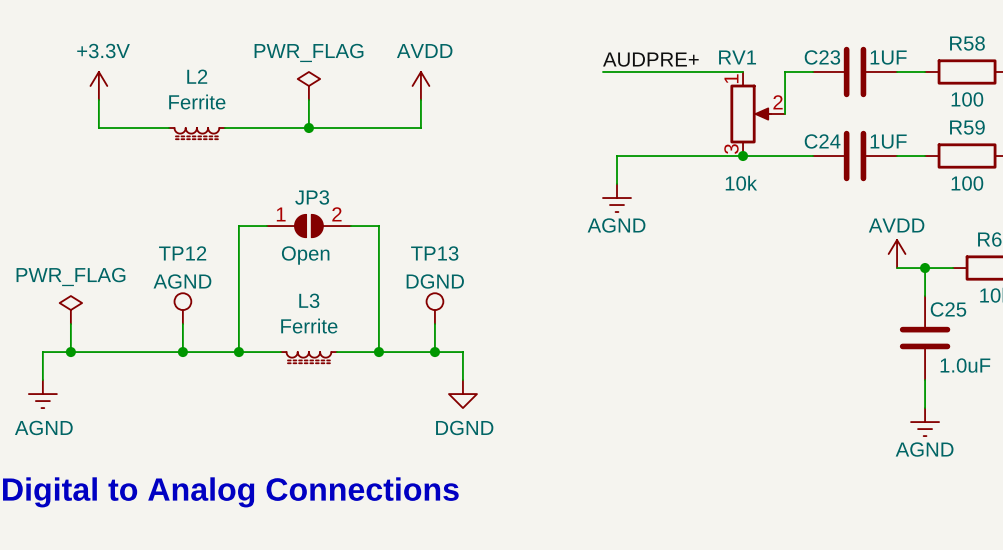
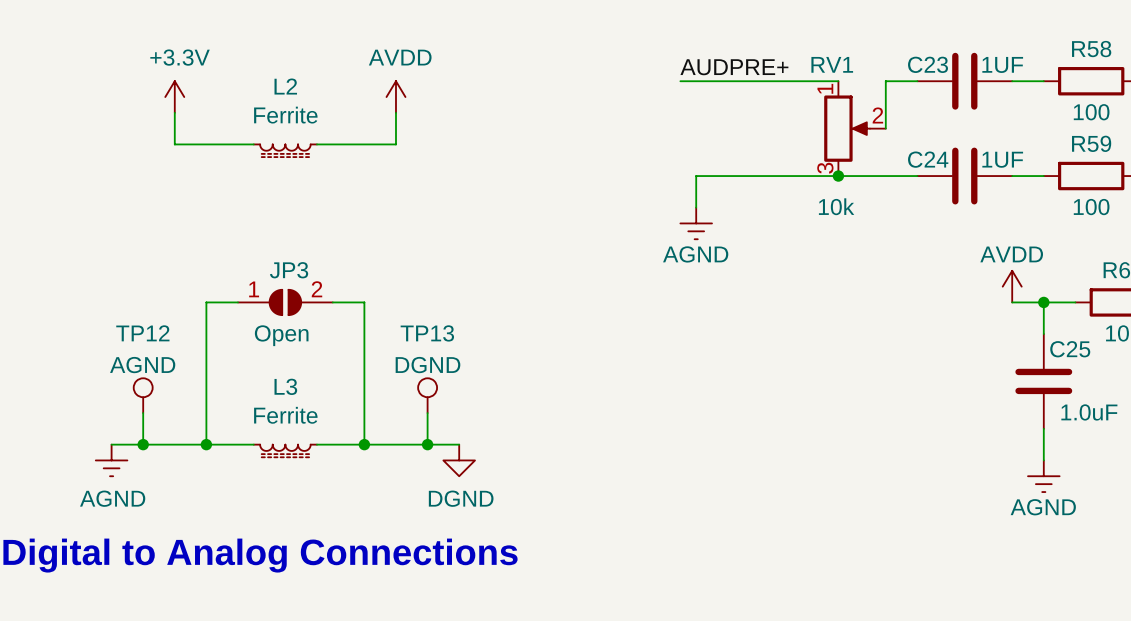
power symbol position: +3.3V (98, 85) -> +3.3V (174, 97)
power symbol: PWR_FLAG (308, 85) -> none
power symbol position: AVDD (420, 85) -> AVDD (395, 97)
wire: (98, 99) (98, 128) (154, 128) -> (174, 112) (174, 144)
wire: (308, 99) (308, 128) -> none
wire: (420, 99) (420, 128) (350, 128) -> (395, 112) (395, 144)
wire: (224, 128) (280, 128) -> (253, 144) (190, 144)
junction: (308, 128) -> none
L2 position: (196, 133) -> (285, 150)
wire: (266, 226) (238, 226) (238, 352) -> none
JP3 position: (308, 226) -> (285, 302)
wire: (350, 226) (378, 226) (378, 352) -> (332, 302) (364, 302) (364, 444)
wire: none -> (237, 302) (206, 302) (206, 365)
TP12 position: (182, 308) -> (143, 395)
TP13 position: (434, 308) -> (427, 395)
power symbol: PWR_FLAG (70, 310) -> none
wire: (70, 324) (70, 352) -> (143, 413) (143, 444)
wire: (434, 324) (434, 352) -> (427, 413) (427, 444)
junction: (70, 352) -> none
wire: none -> (206, 397) (206, 444)
junction: (182, 352) -> none
junction: (238, 352) -> none
wire: (280, 352) (42, 352) (42, 380) -> none
wire: (336, 352) (462, 352) (462, 380) -> none
junction: (378, 352) -> none
junction: (434, 352) -> none
L3 position: (308, 357) -> (285, 450)
power symbol position: AGND (42, 394) -> AGND (111, 460)
wire: none -> (111, 444) (253, 444)
junction: none -> (143, 444)
junction: none -> (206, 444)
wire: none -> (316, 444) (459, 444)
junction: none -> (364, 444)
junction: none -> (427, 444)
power symbol position: DGND (462, 394) -> DGND (459, 460)

